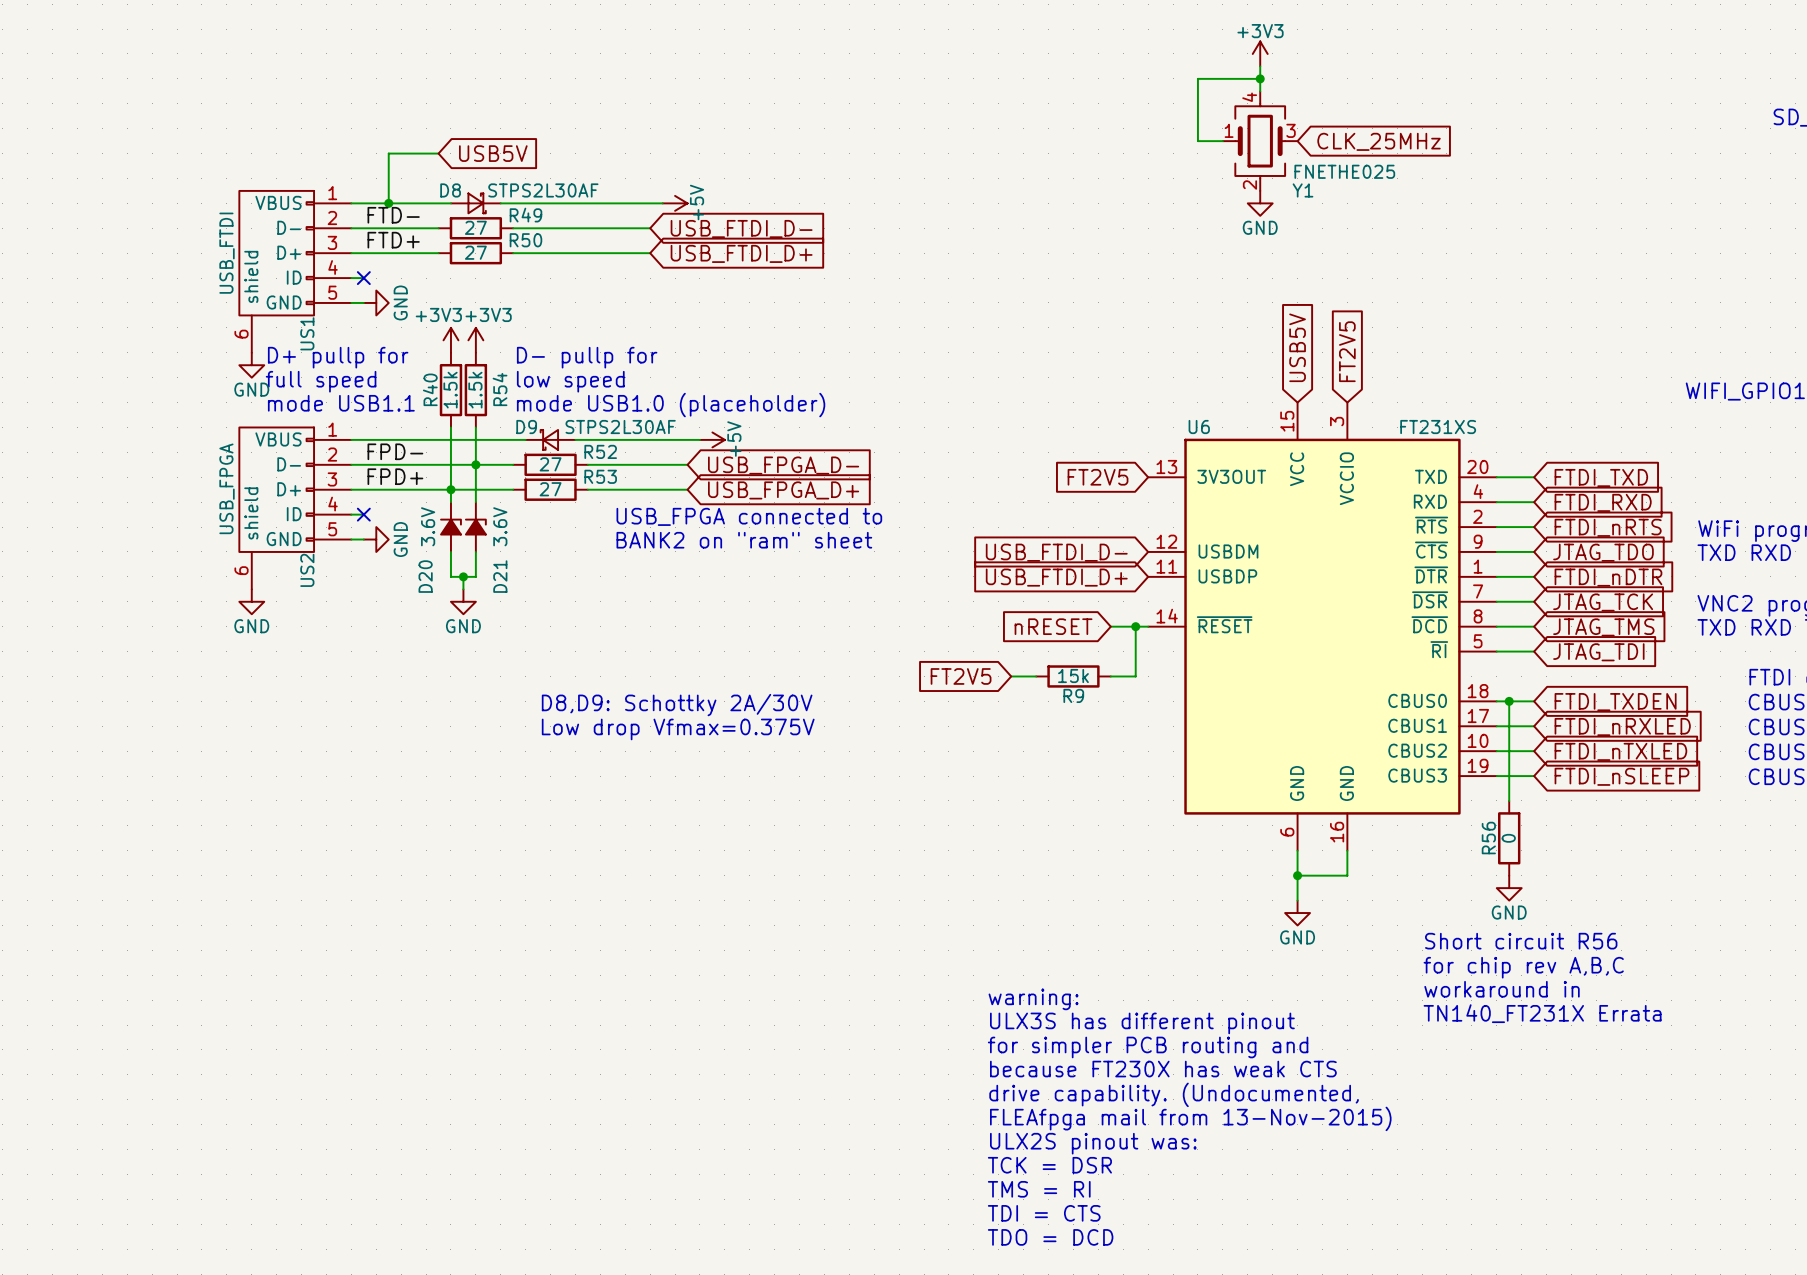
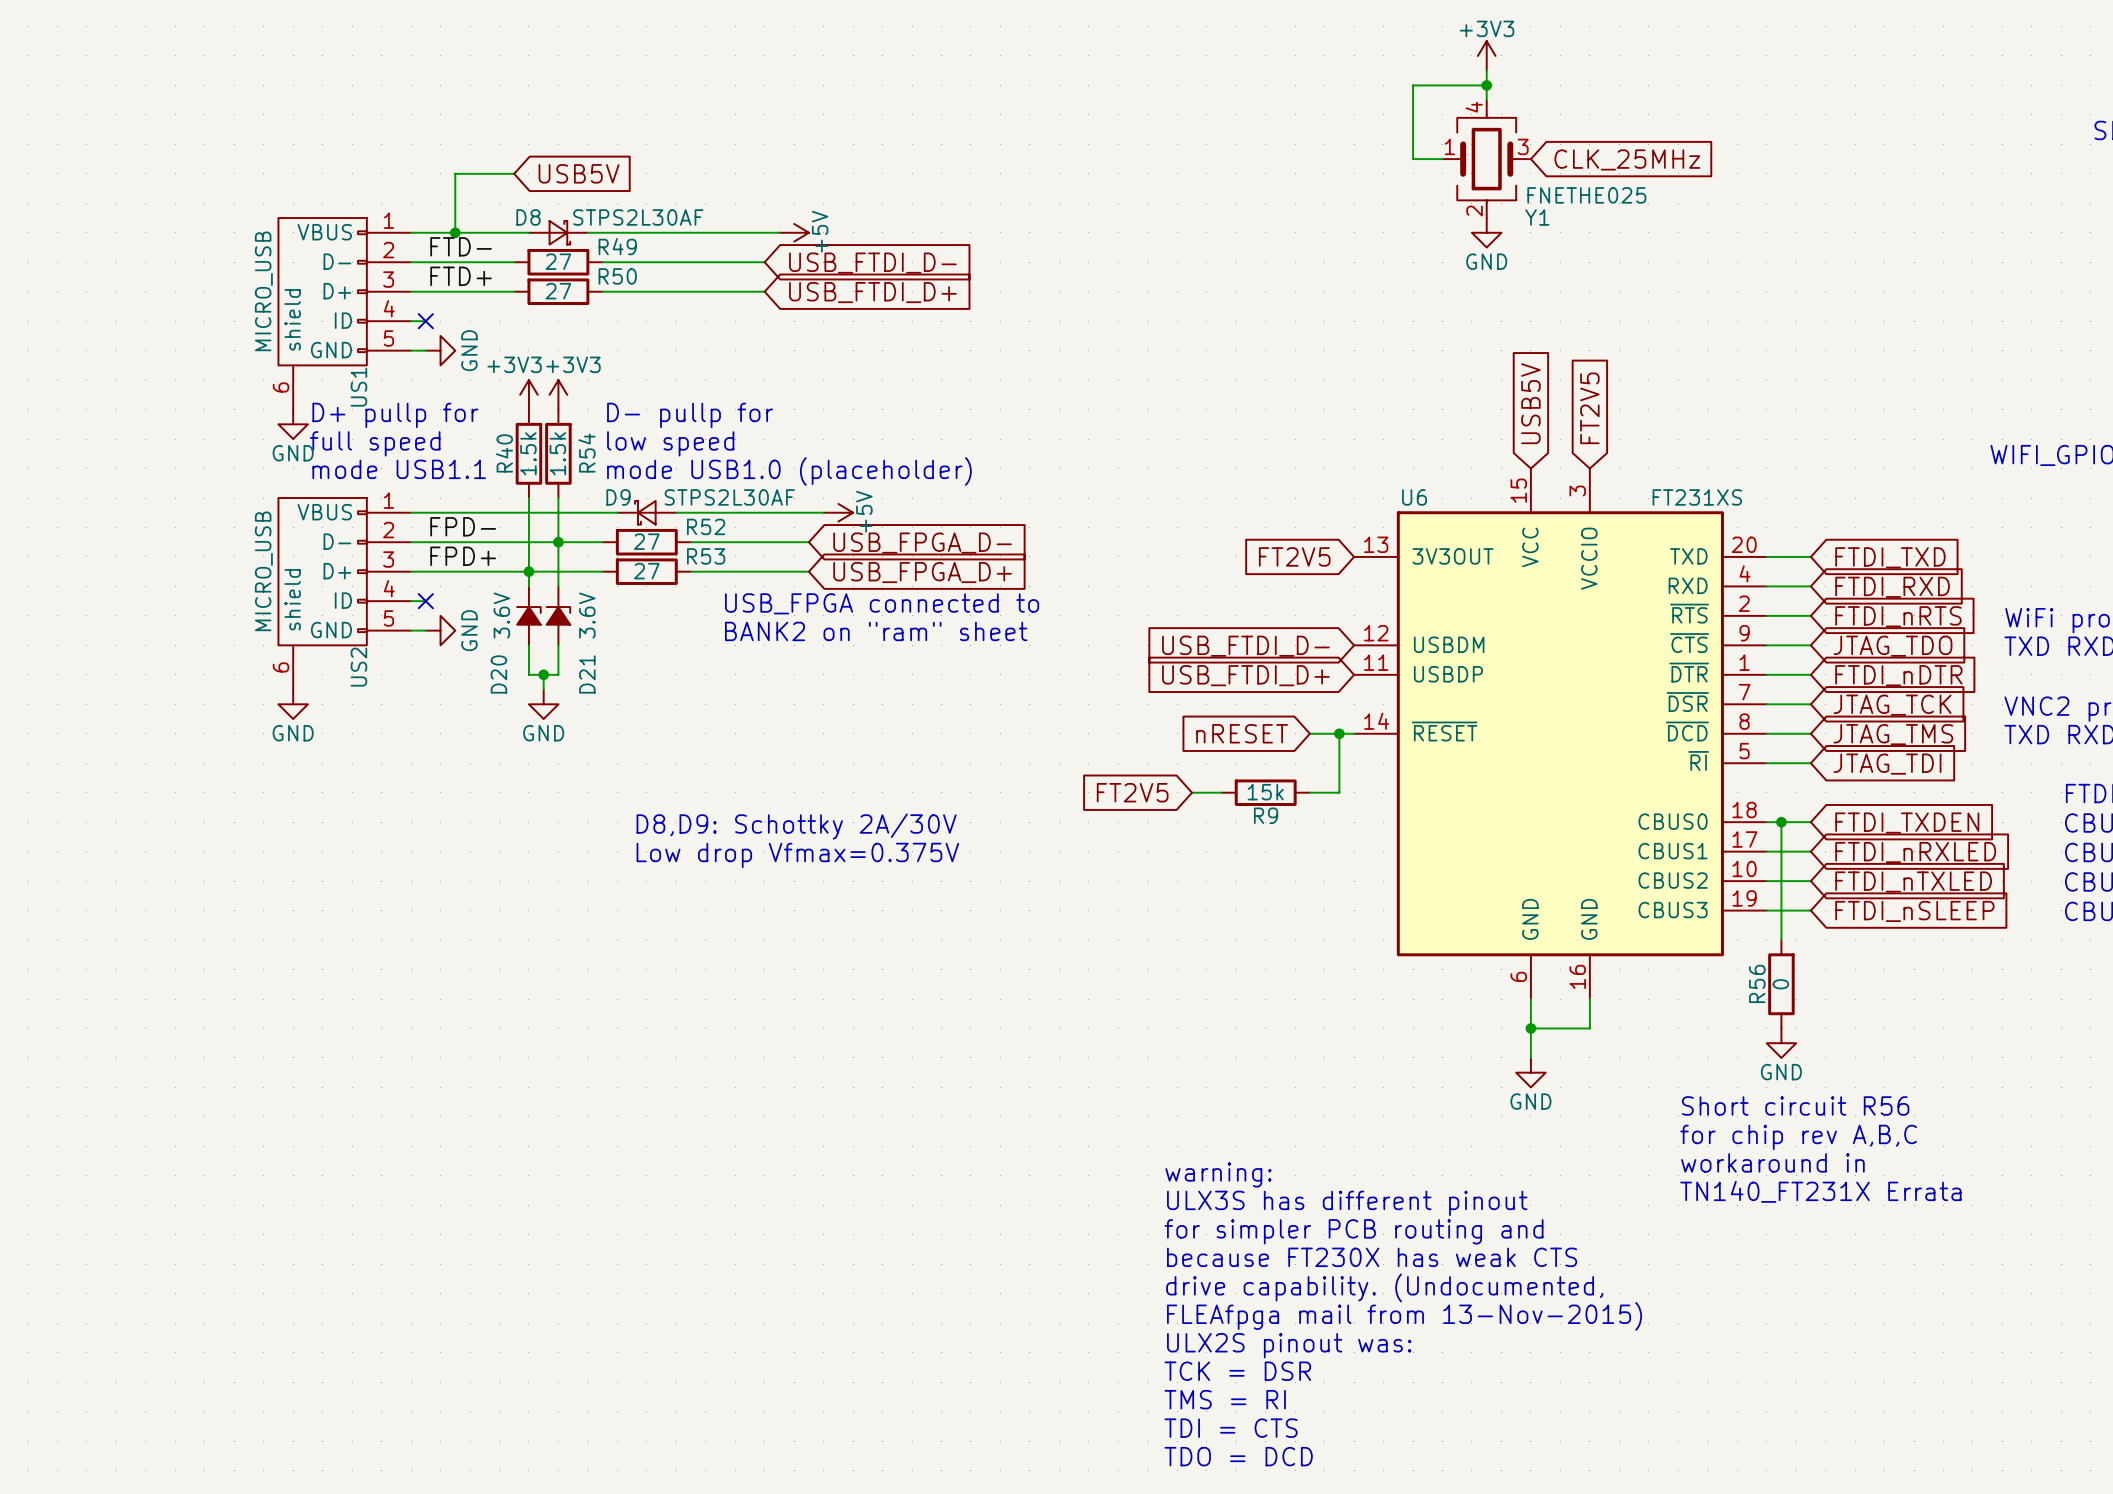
US1 value: USB_FTDI (227, 253) -> MICRO_USB (263, 291)
US2 value: USB_FPGA (227, 488) -> MICRO_USB (263, 571)

